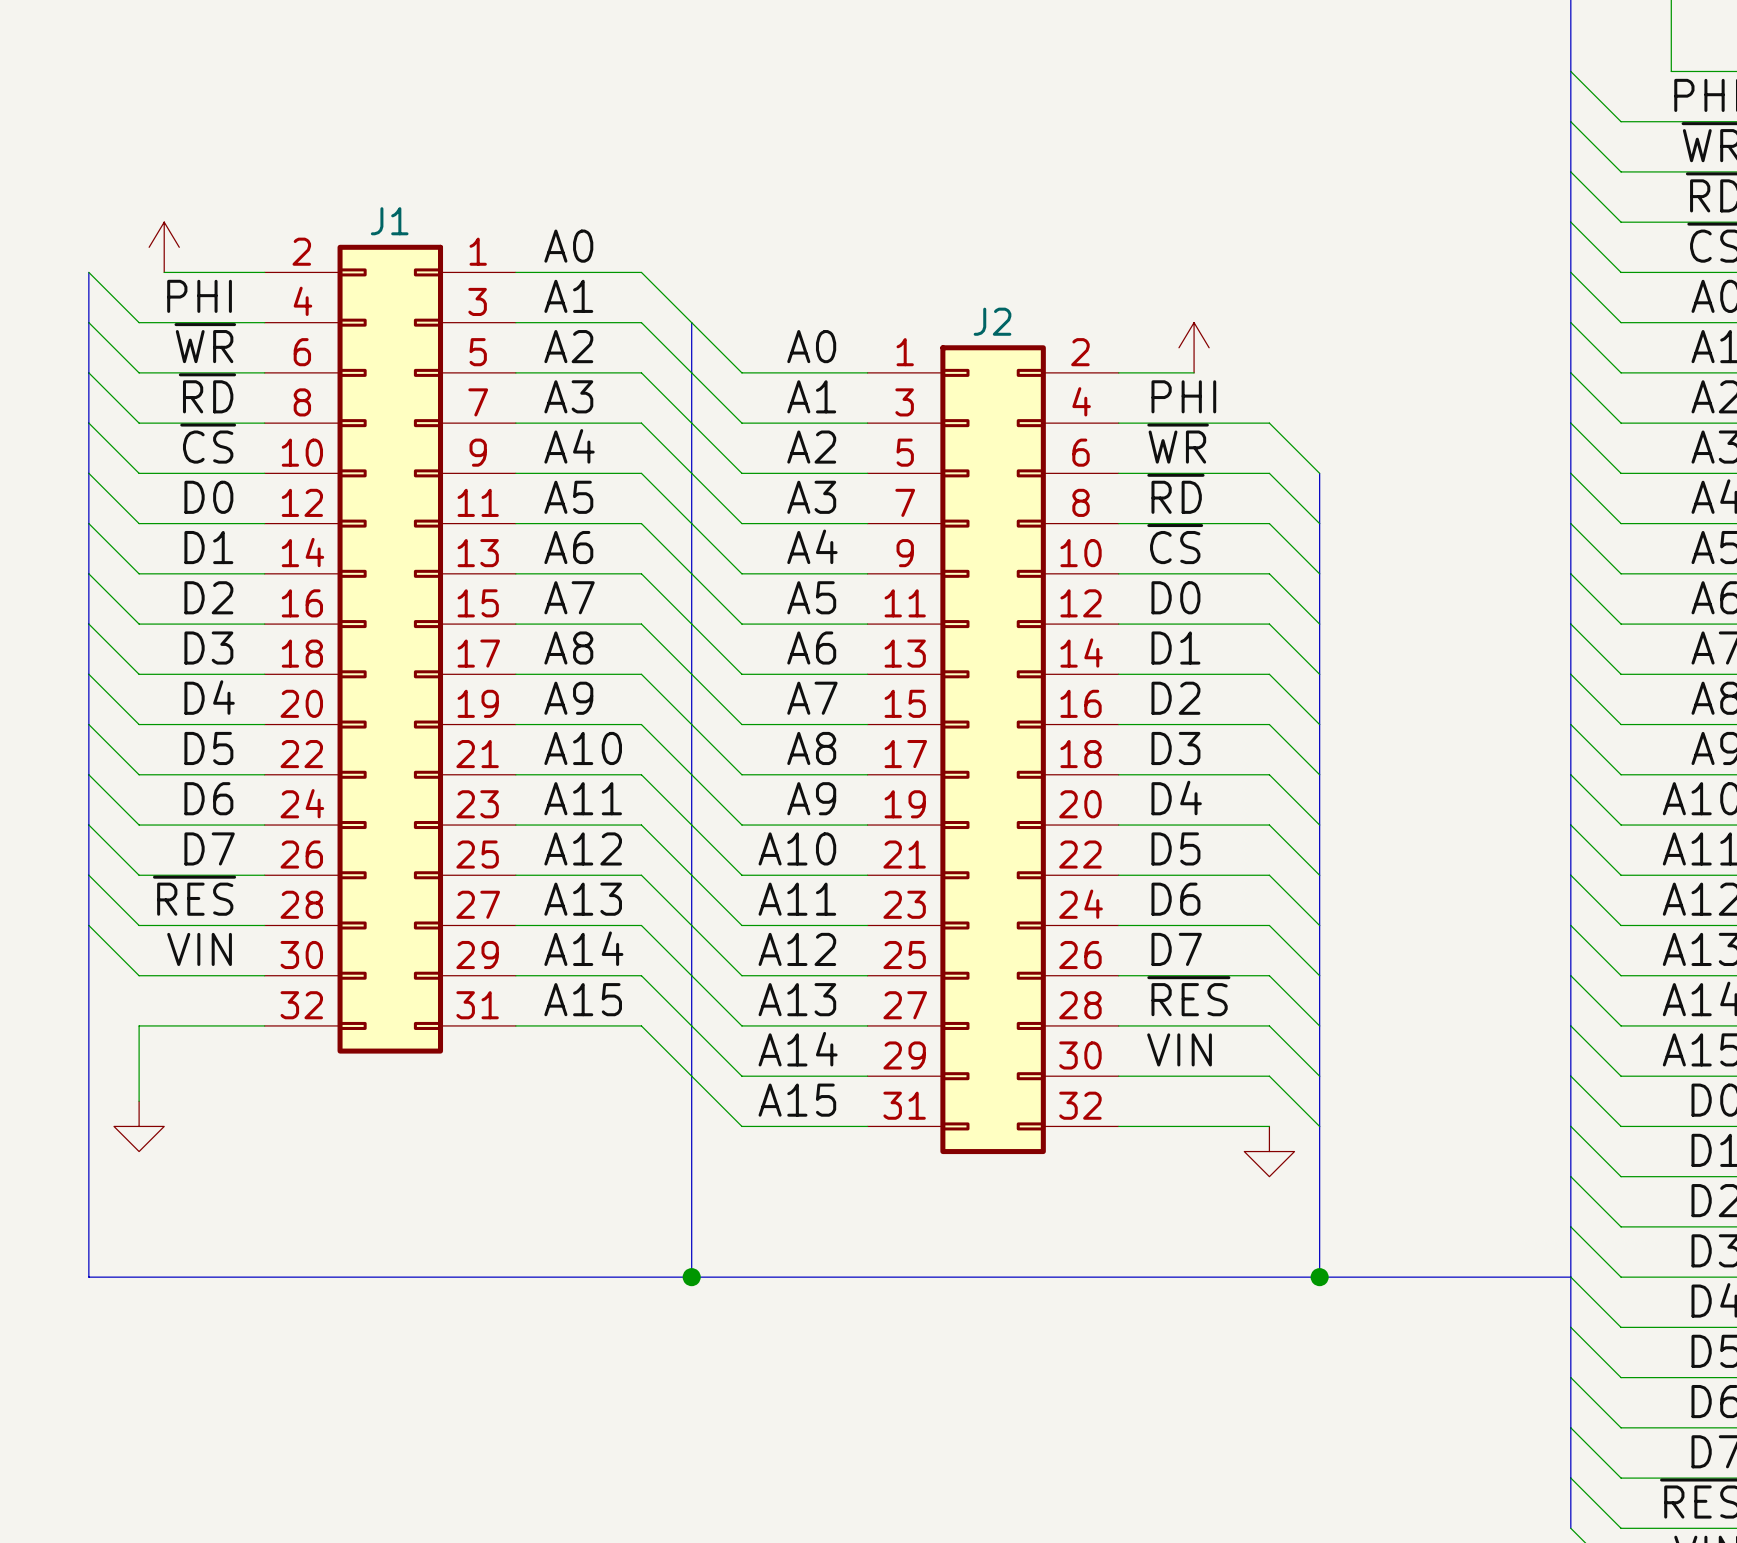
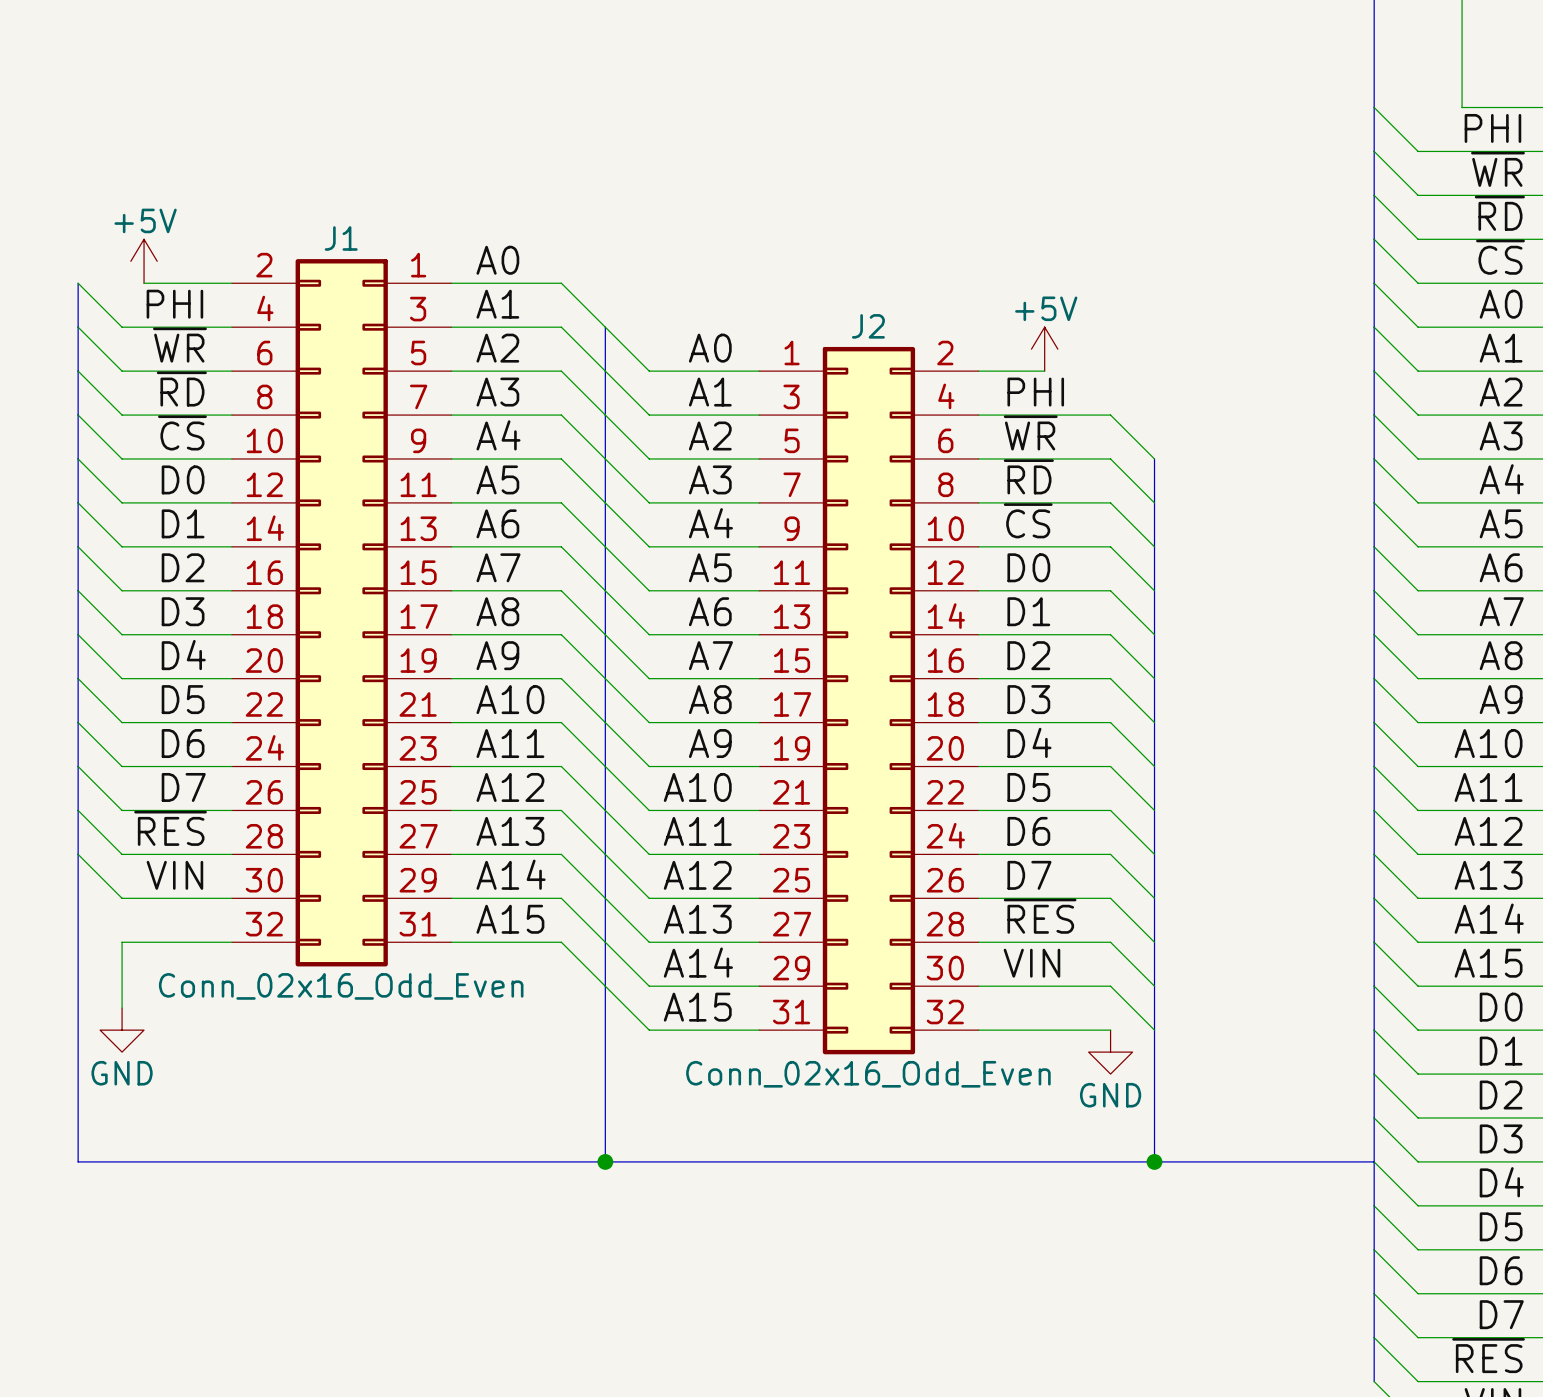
power symbol text: none -> +5V (145, 220)
power symbol text: none -> +5V (1046, 308)
J1 value: none -> Conn_02x16_Odd_Even (341, 986)
power symbol text: none -> GND (122, 1073)
J2 value: none -> Conn_02x16_Odd_Even (868, 1074)
power symbol text: none -> GND (1110, 1095)

